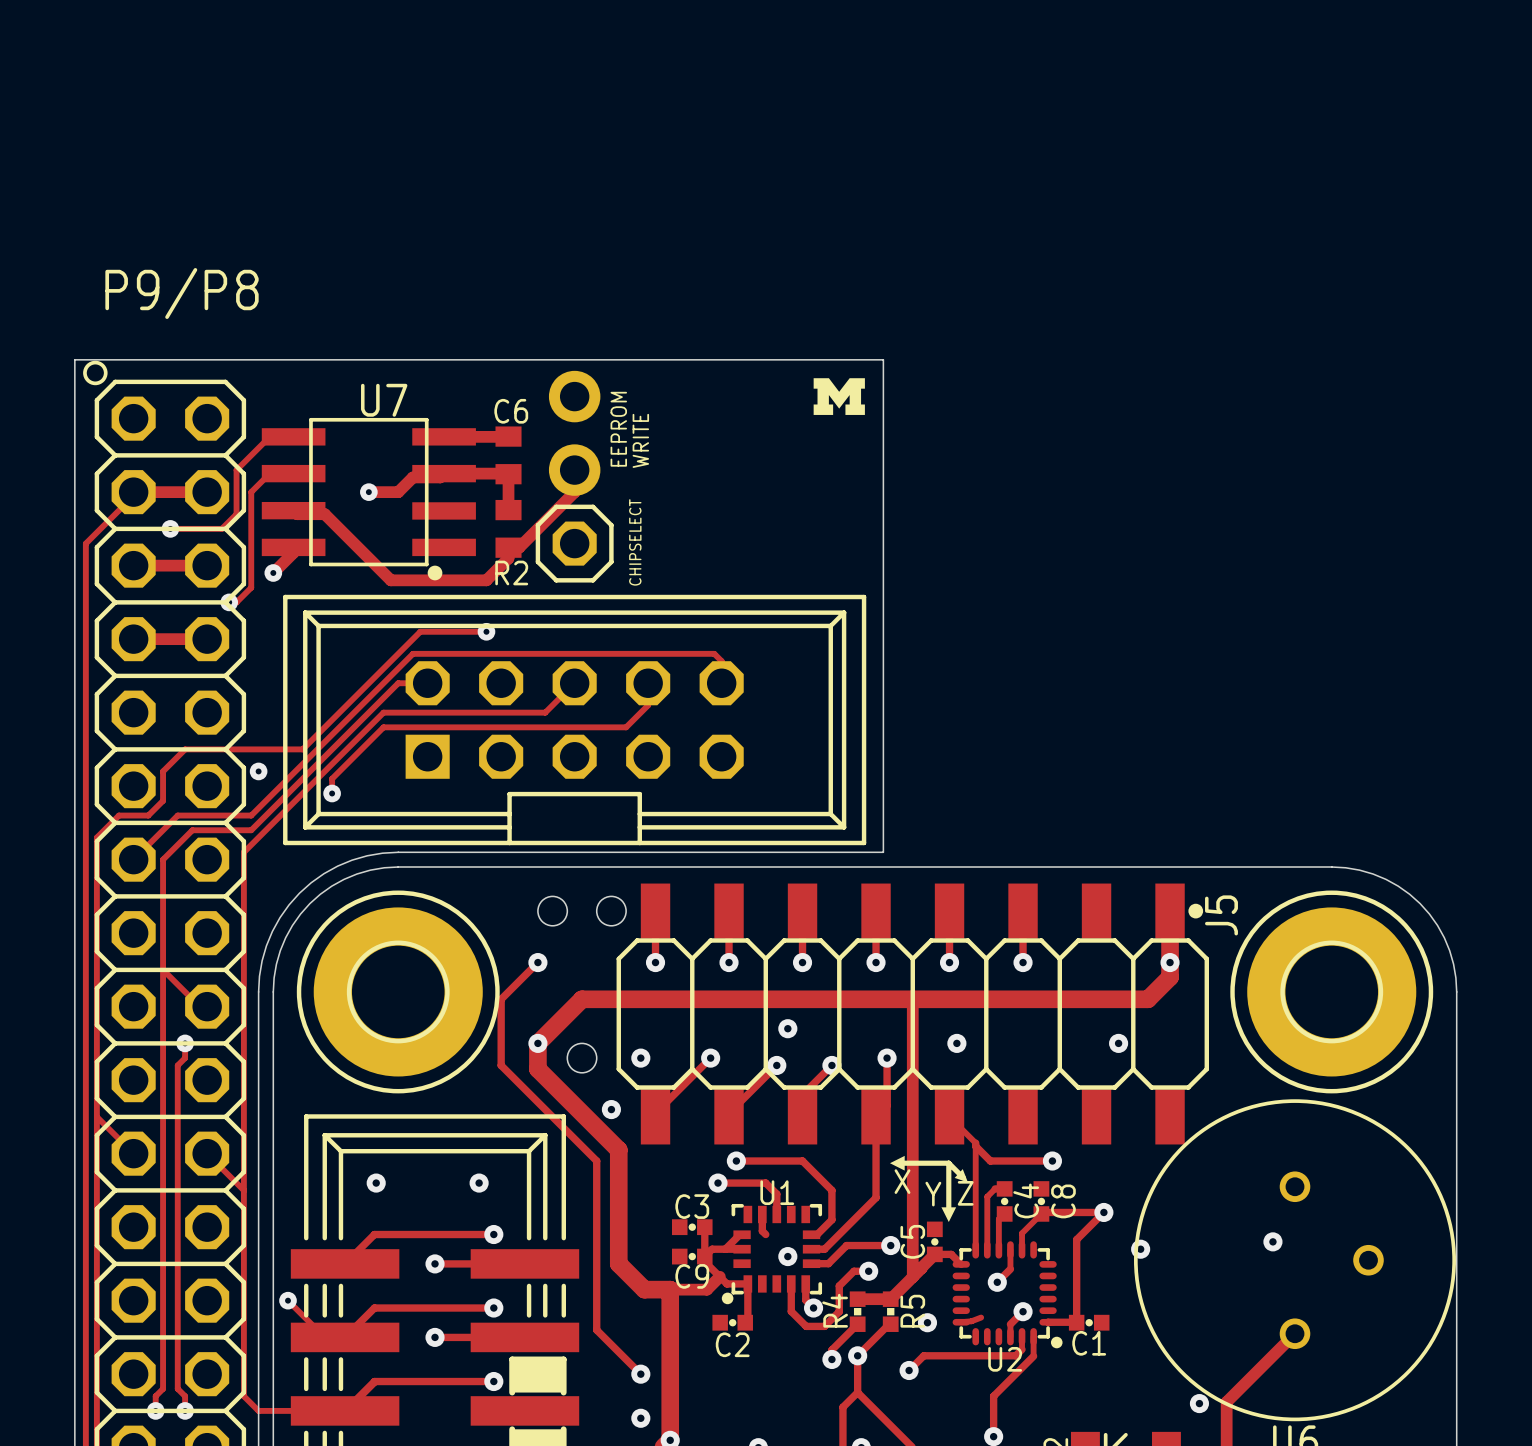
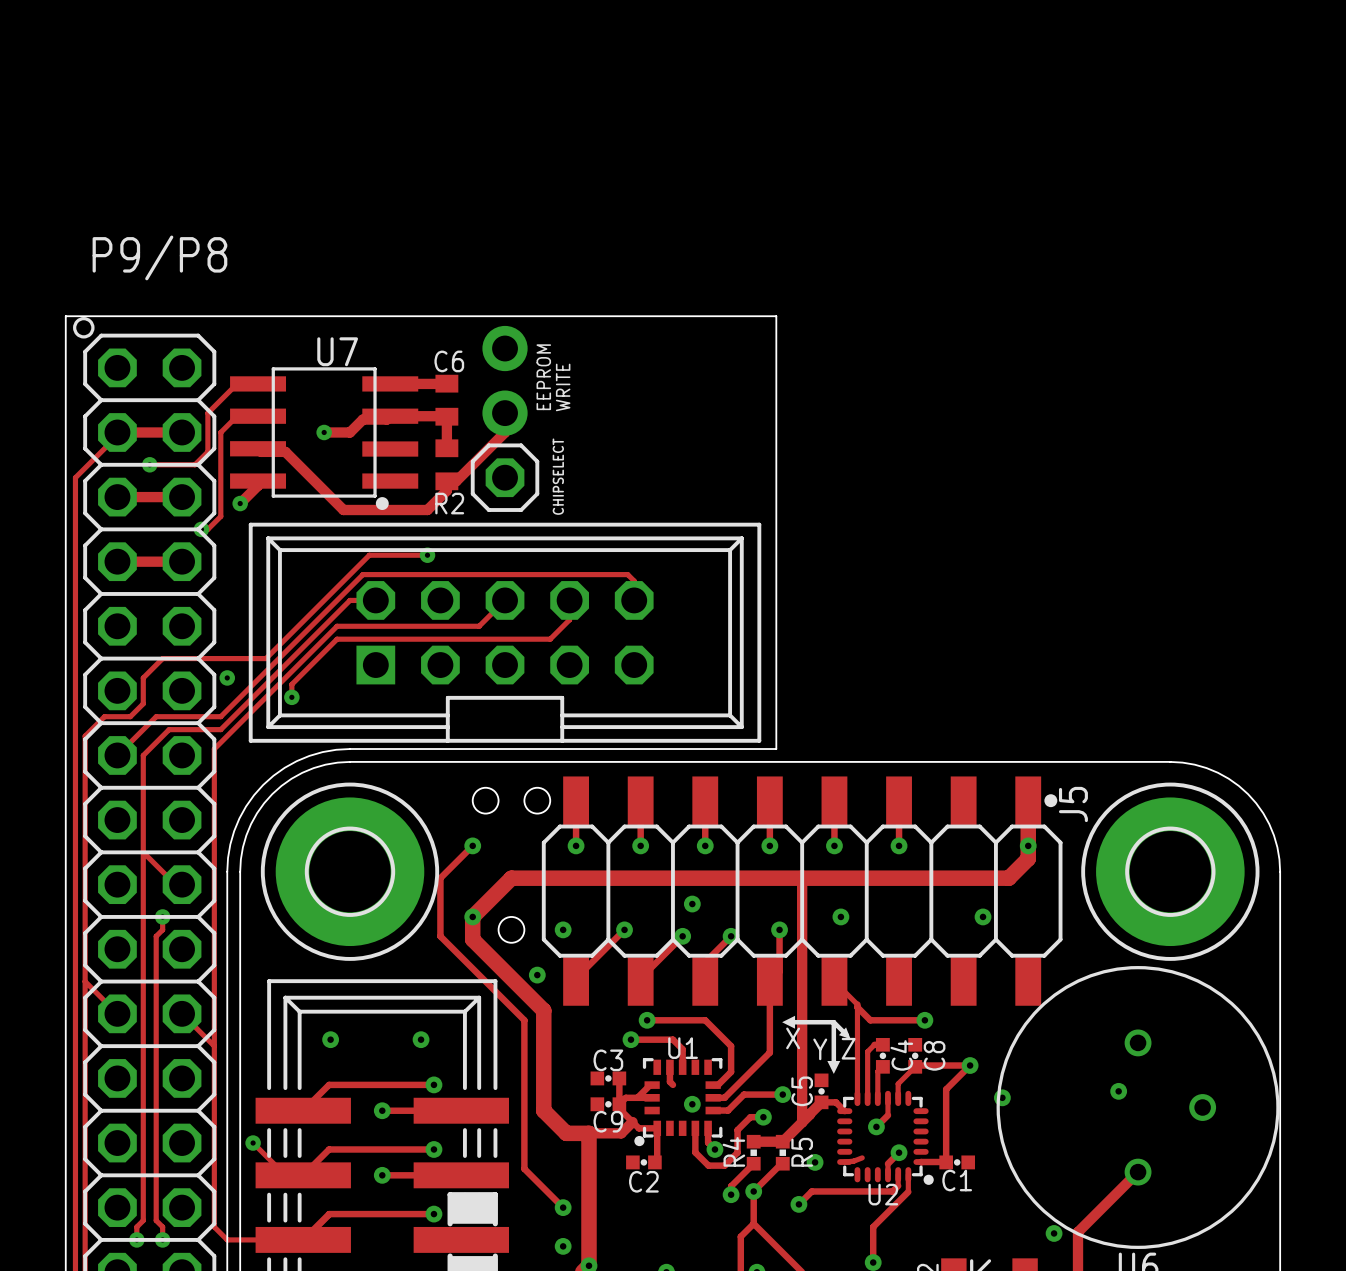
drawing: [813, 378, 865, 415] -> none

